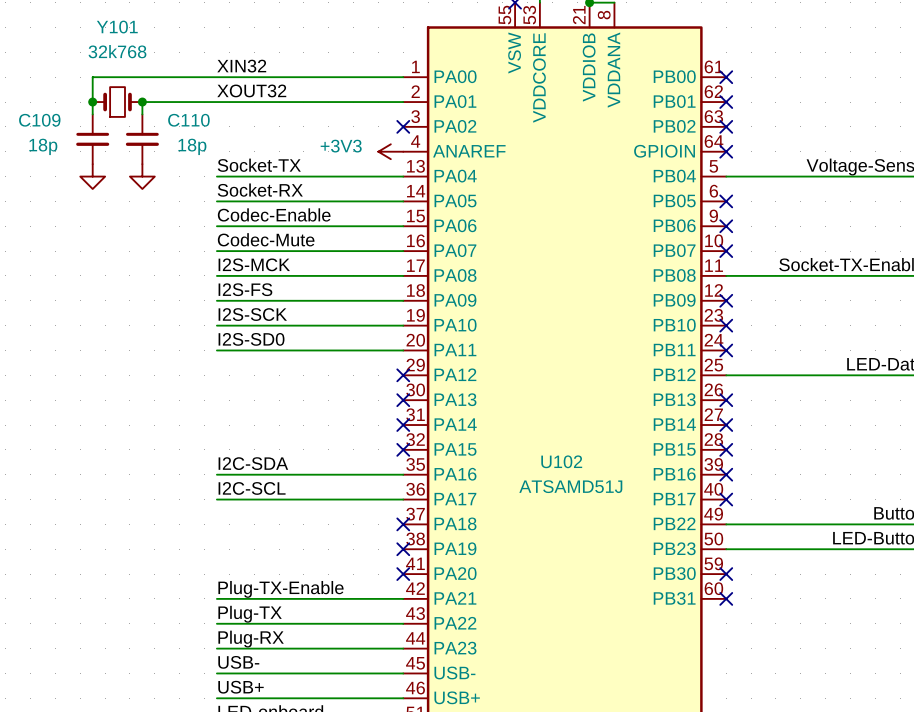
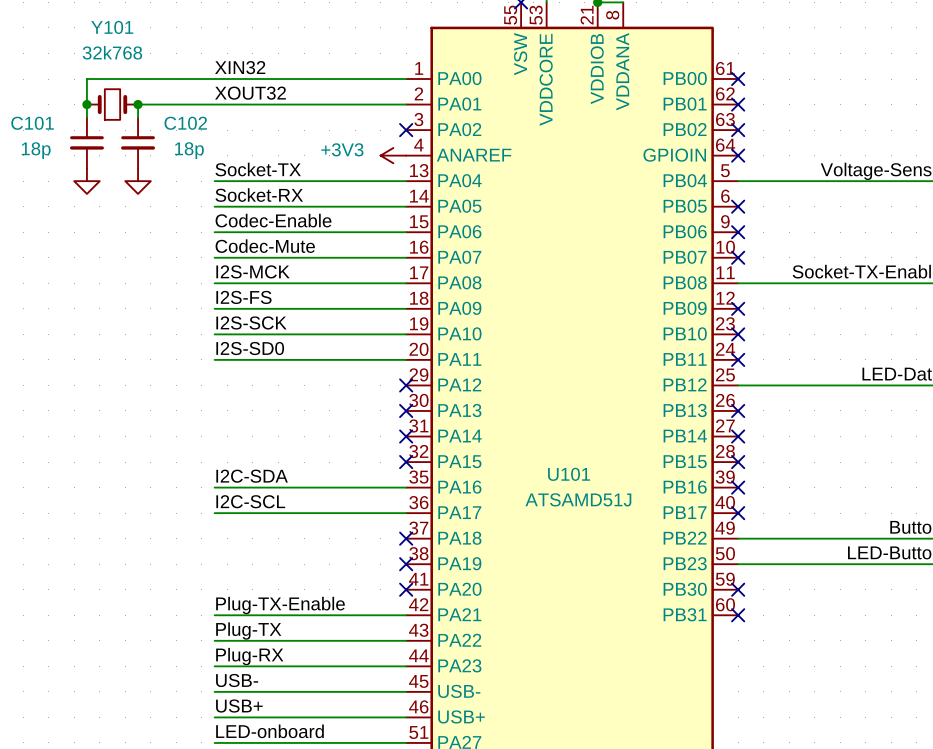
C109 name: C109 (39, 120) -> C101 (32, 123)
C110 name: C110 (188, 120) -> C102 (185, 123)
U102 name: U102 (561, 461) -> U101 (569, 474)

